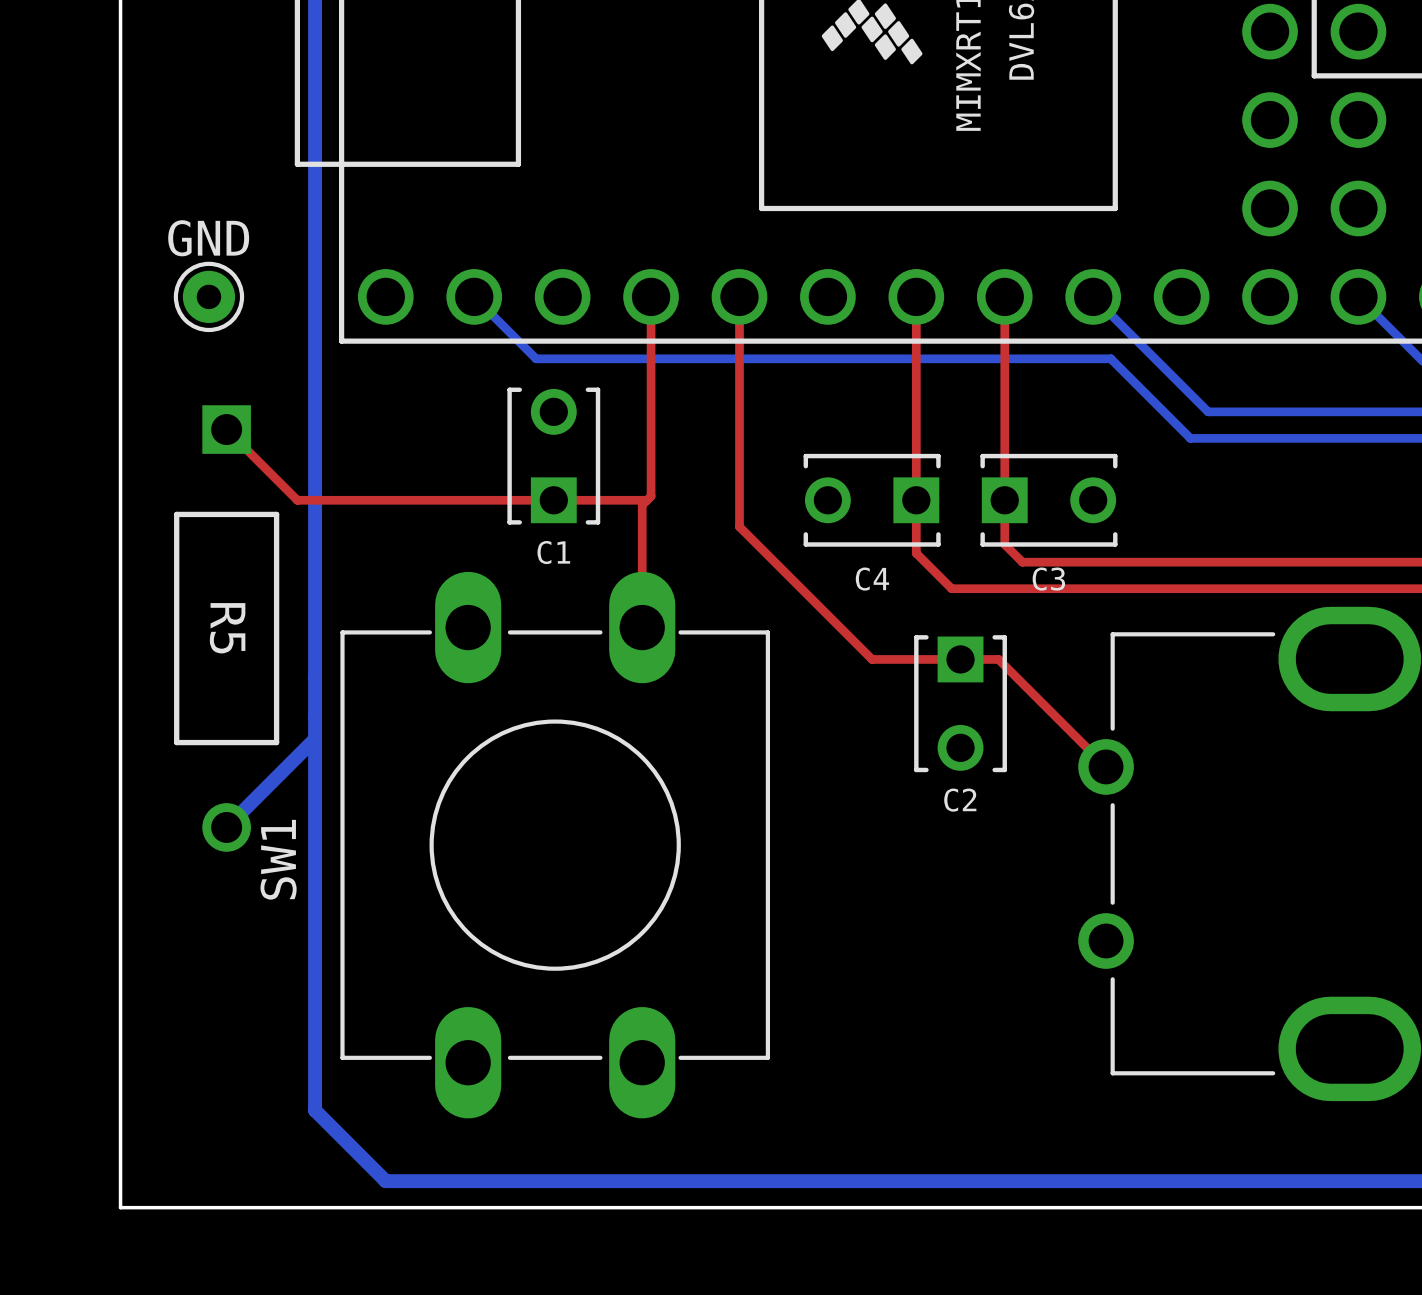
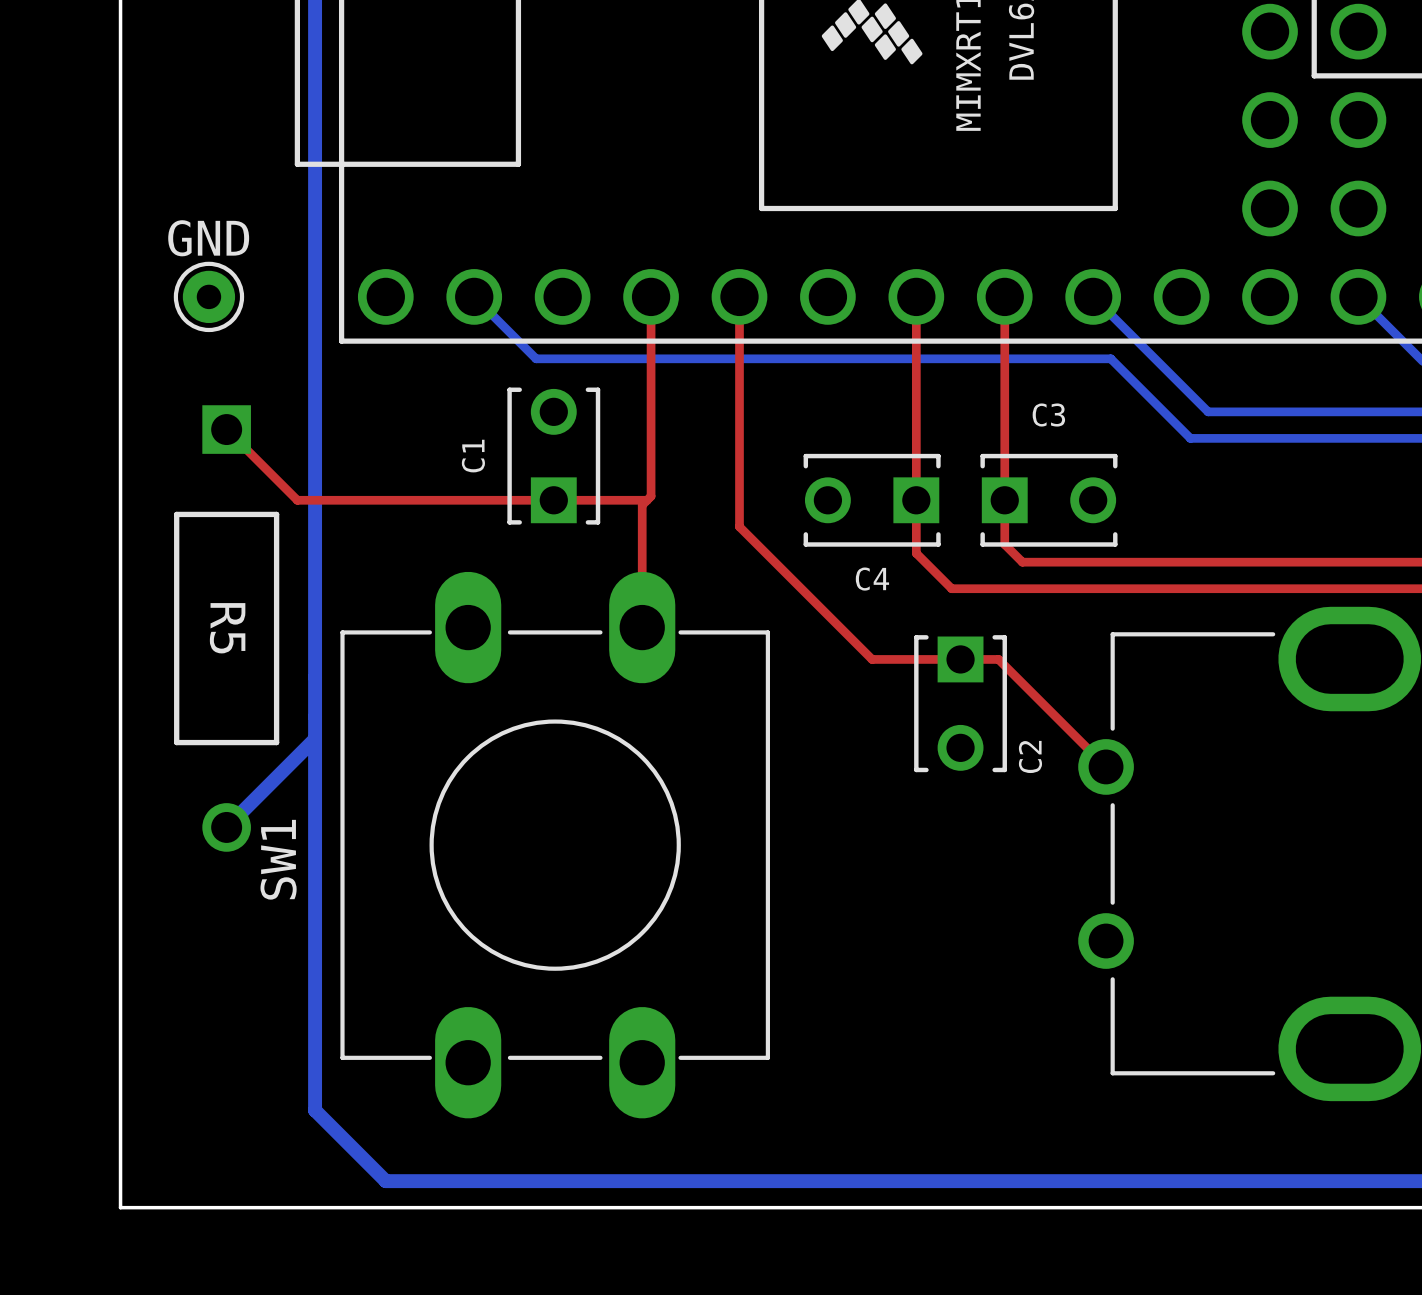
C1 name rotation: 0° (553, 552) -> 90° counterclockwise (473, 456)
C1 name position: C1 (553, 552) -> C1 (473, 456)
C3 name position: C3 (1048, 579) -> C3 (1048, 415)
C2 name rotation: 0° (960, 800) -> 90° counterclockwise (1030, 756)
C2 name position: C2 (960, 800) -> C2 (1030, 756)

